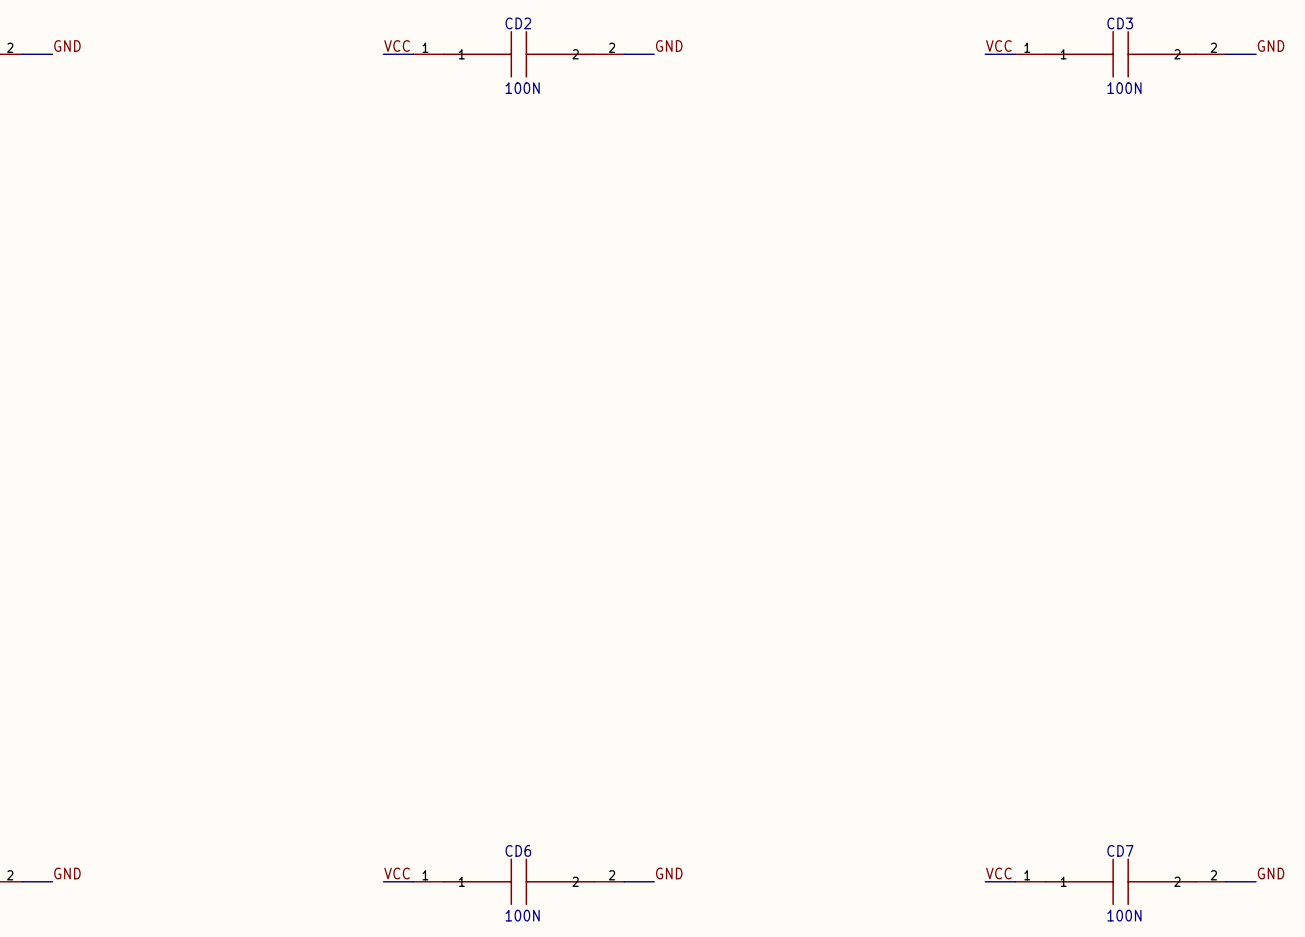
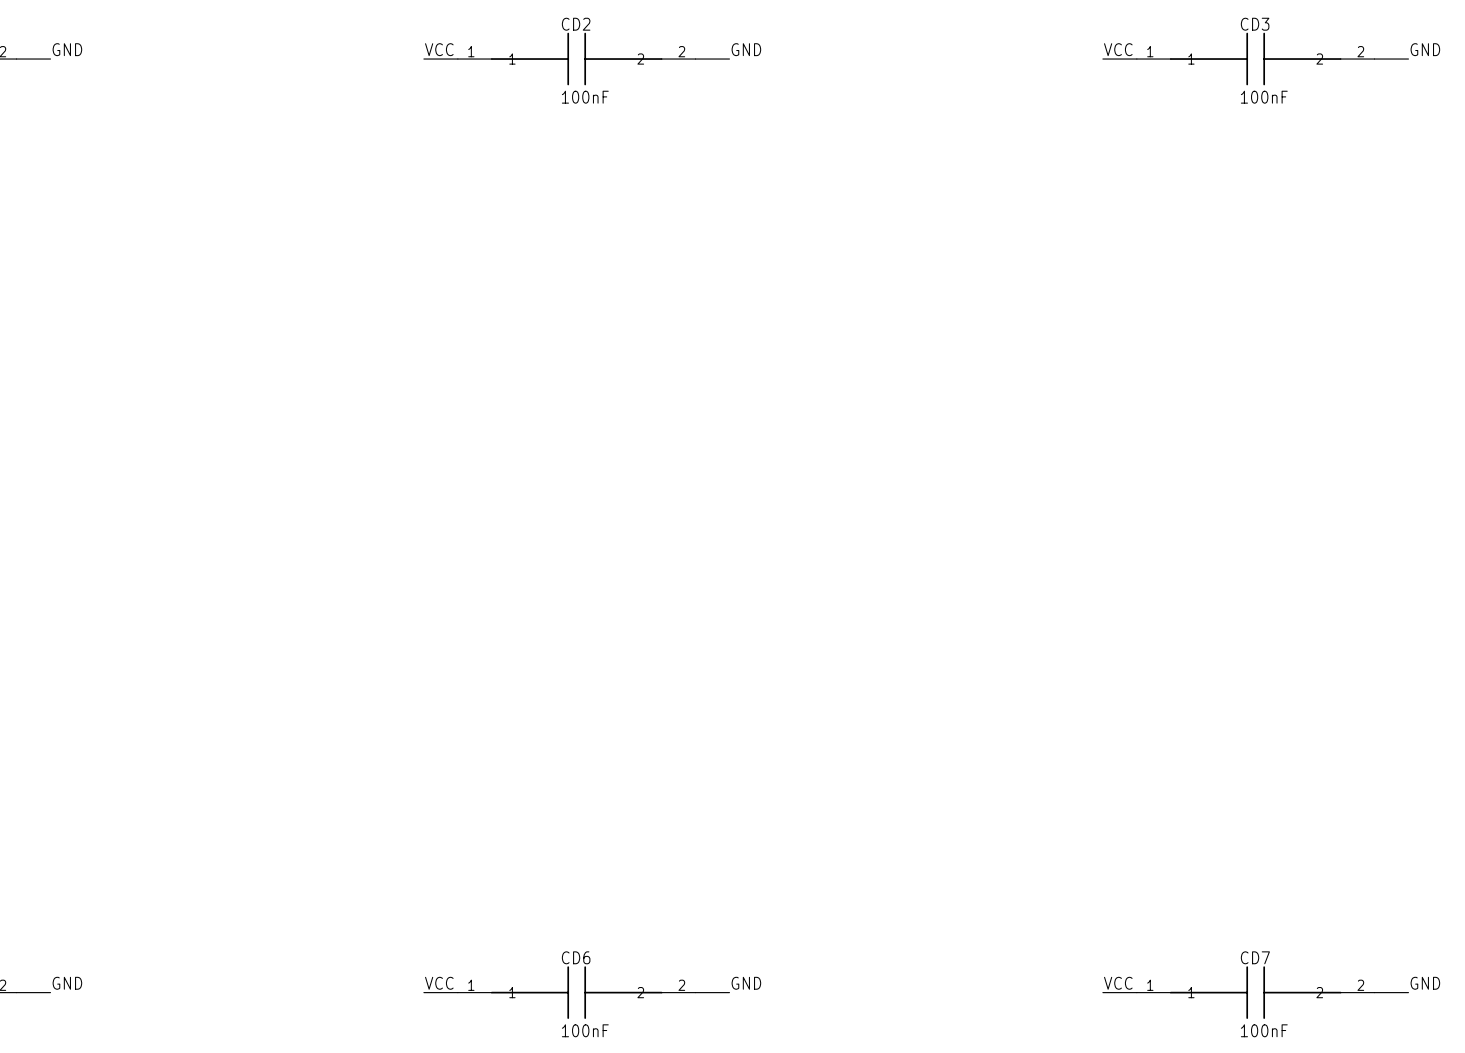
CD2 value: 100N (522, 88) -> 100nF (585, 97)
CD3 value: 100N (1124, 88) -> 100nF (1264, 97)
CD6 value: 100N (522, 915) -> 100nF (585, 1030)
CD7 value: 100N (1124, 915) -> 100nF (1264, 1030)

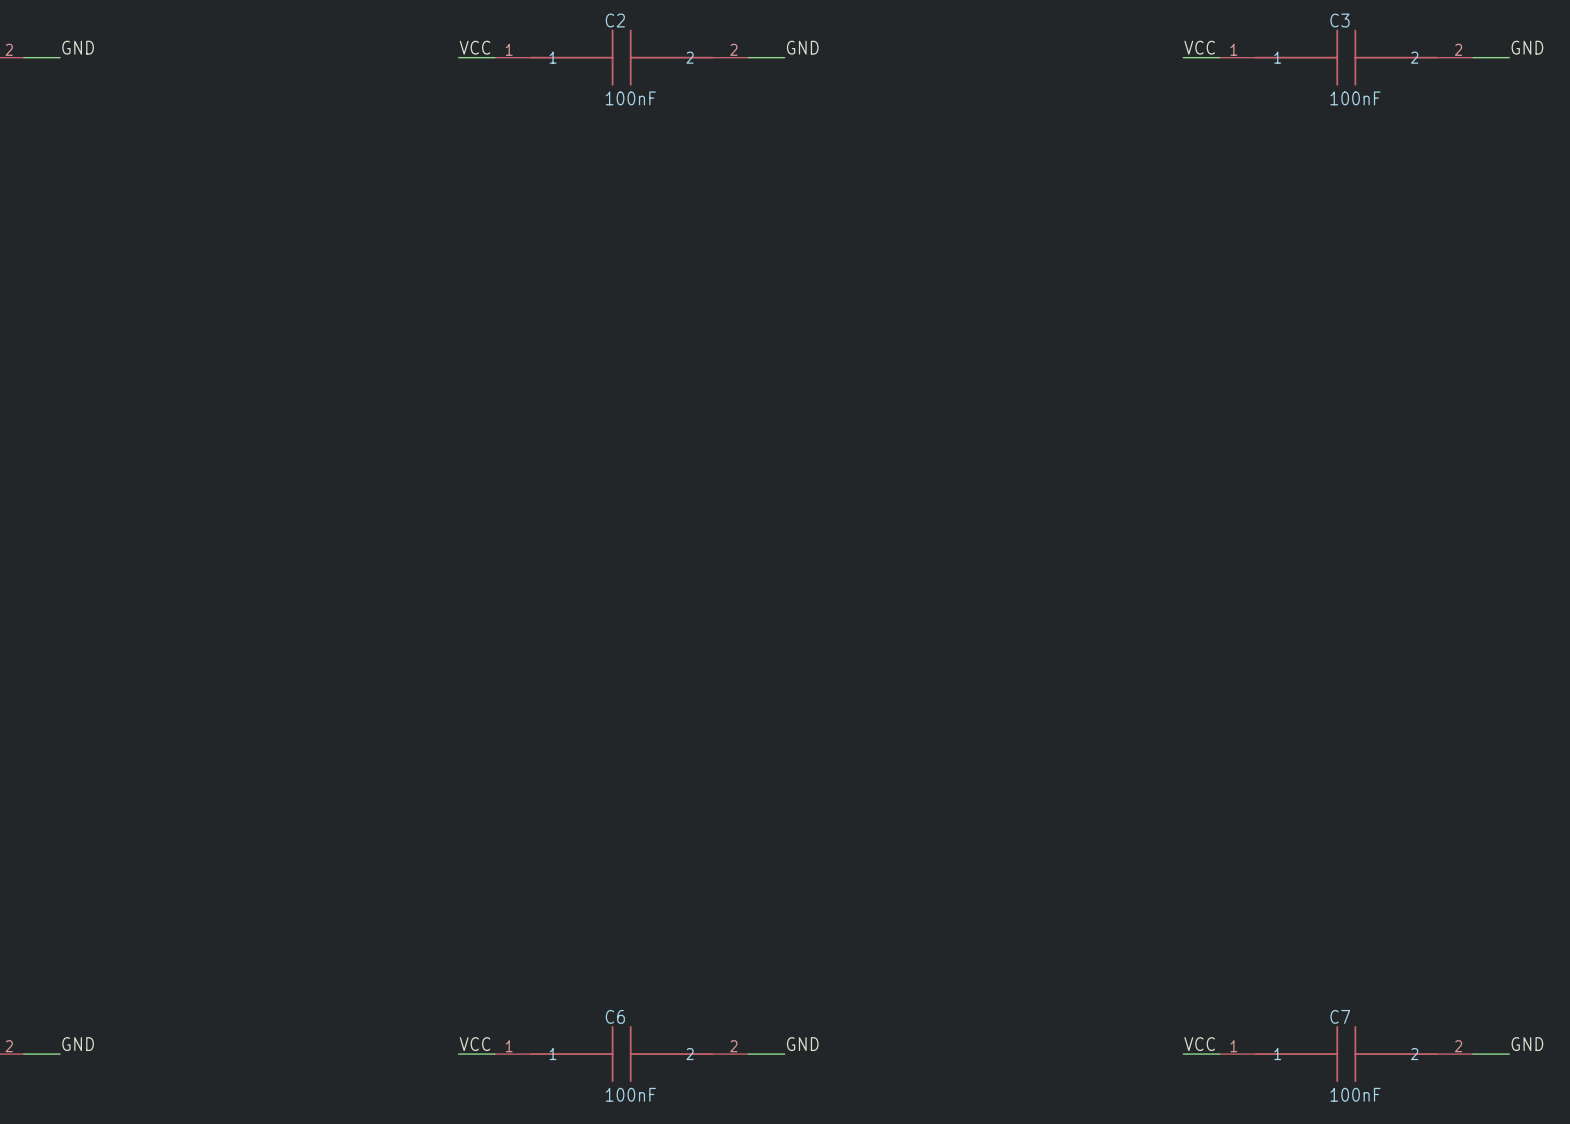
CD2 name: CD2 (576, 24) -> C2 (615, 20)
CD3 name: CD3 (1255, 24) -> C3 (1339, 20)
CD6 name: CD6 (576, 957) -> C6 (615, 1016)
CD7 name: CD7 (1255, 957) -> C7 (1340, 1016)

